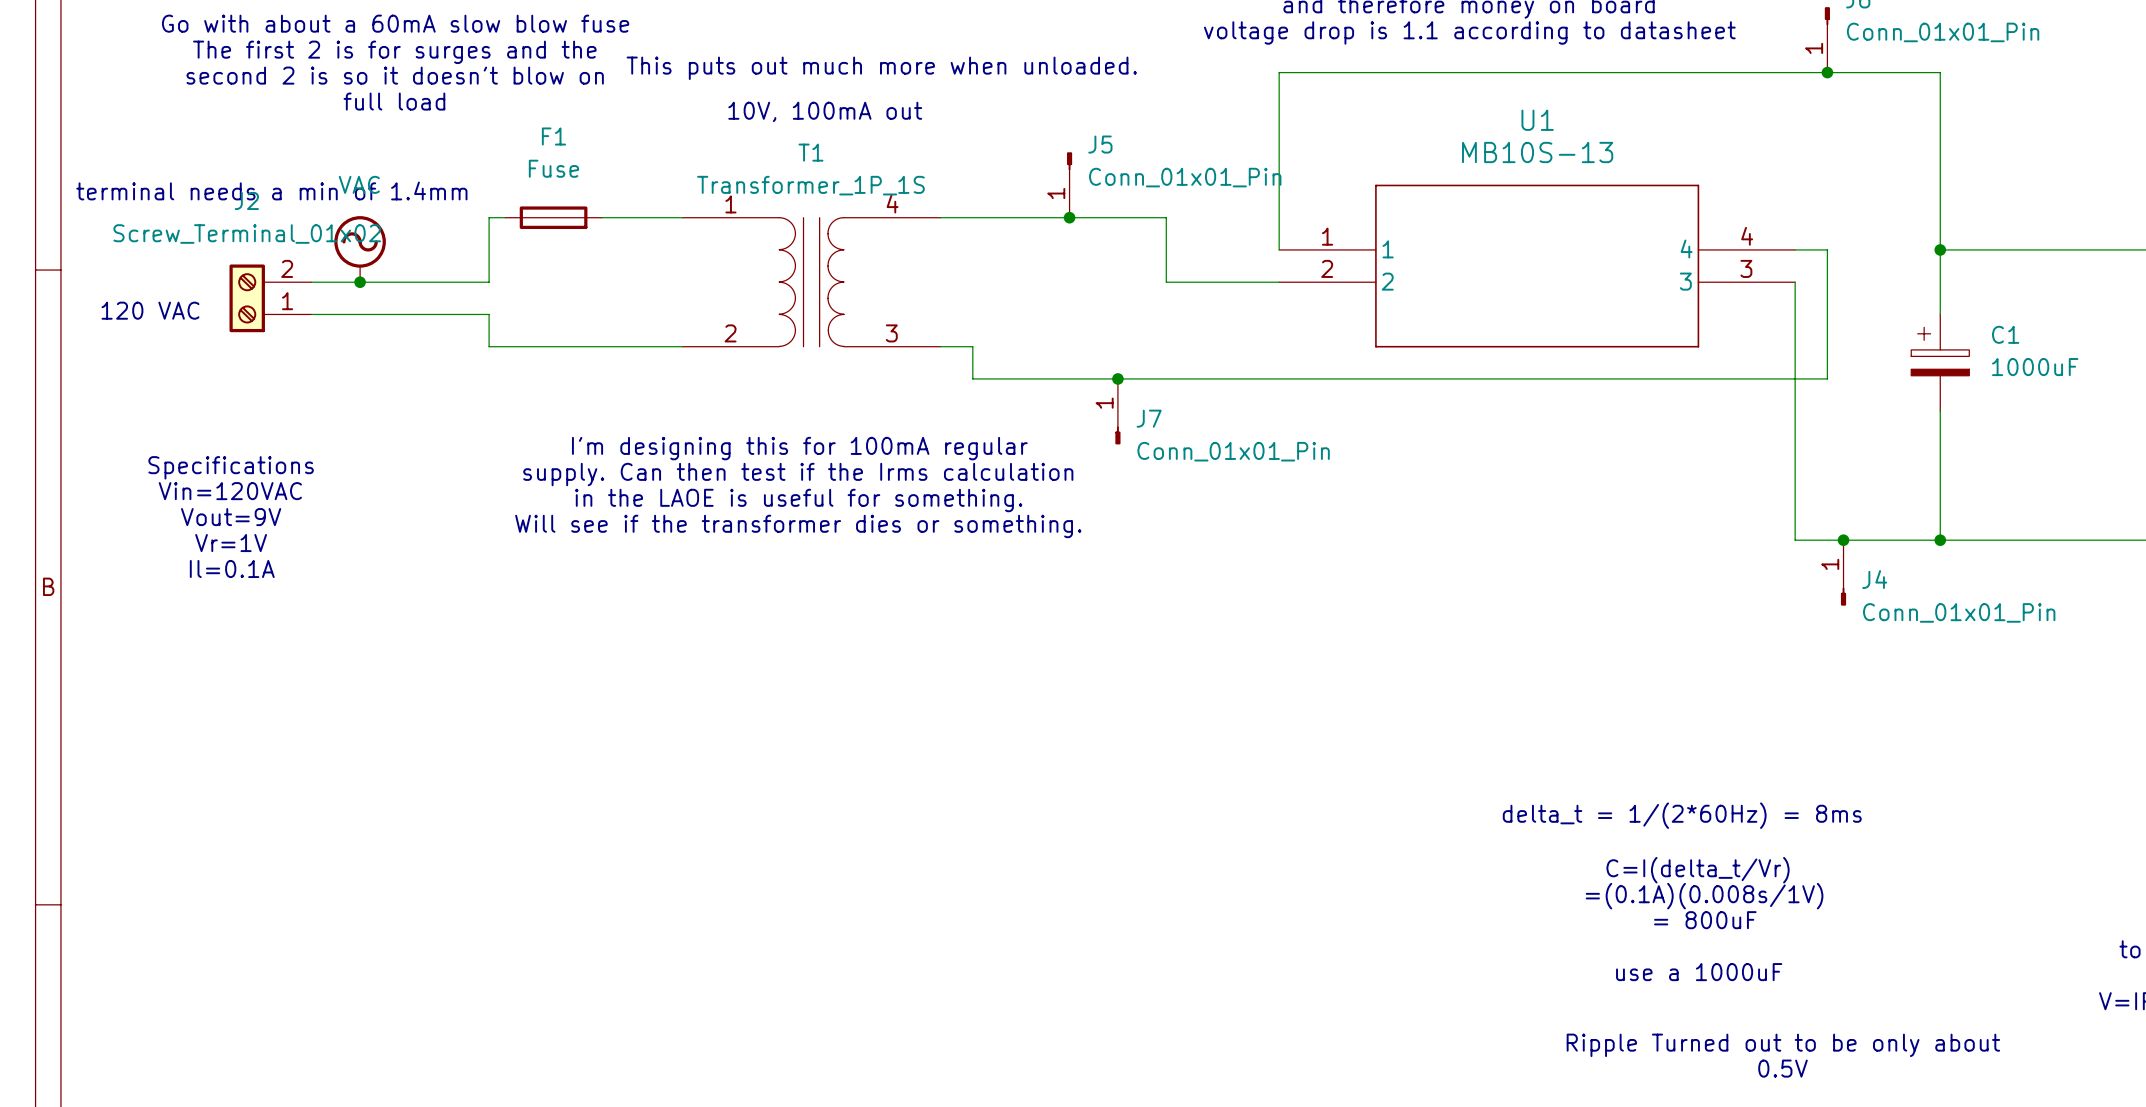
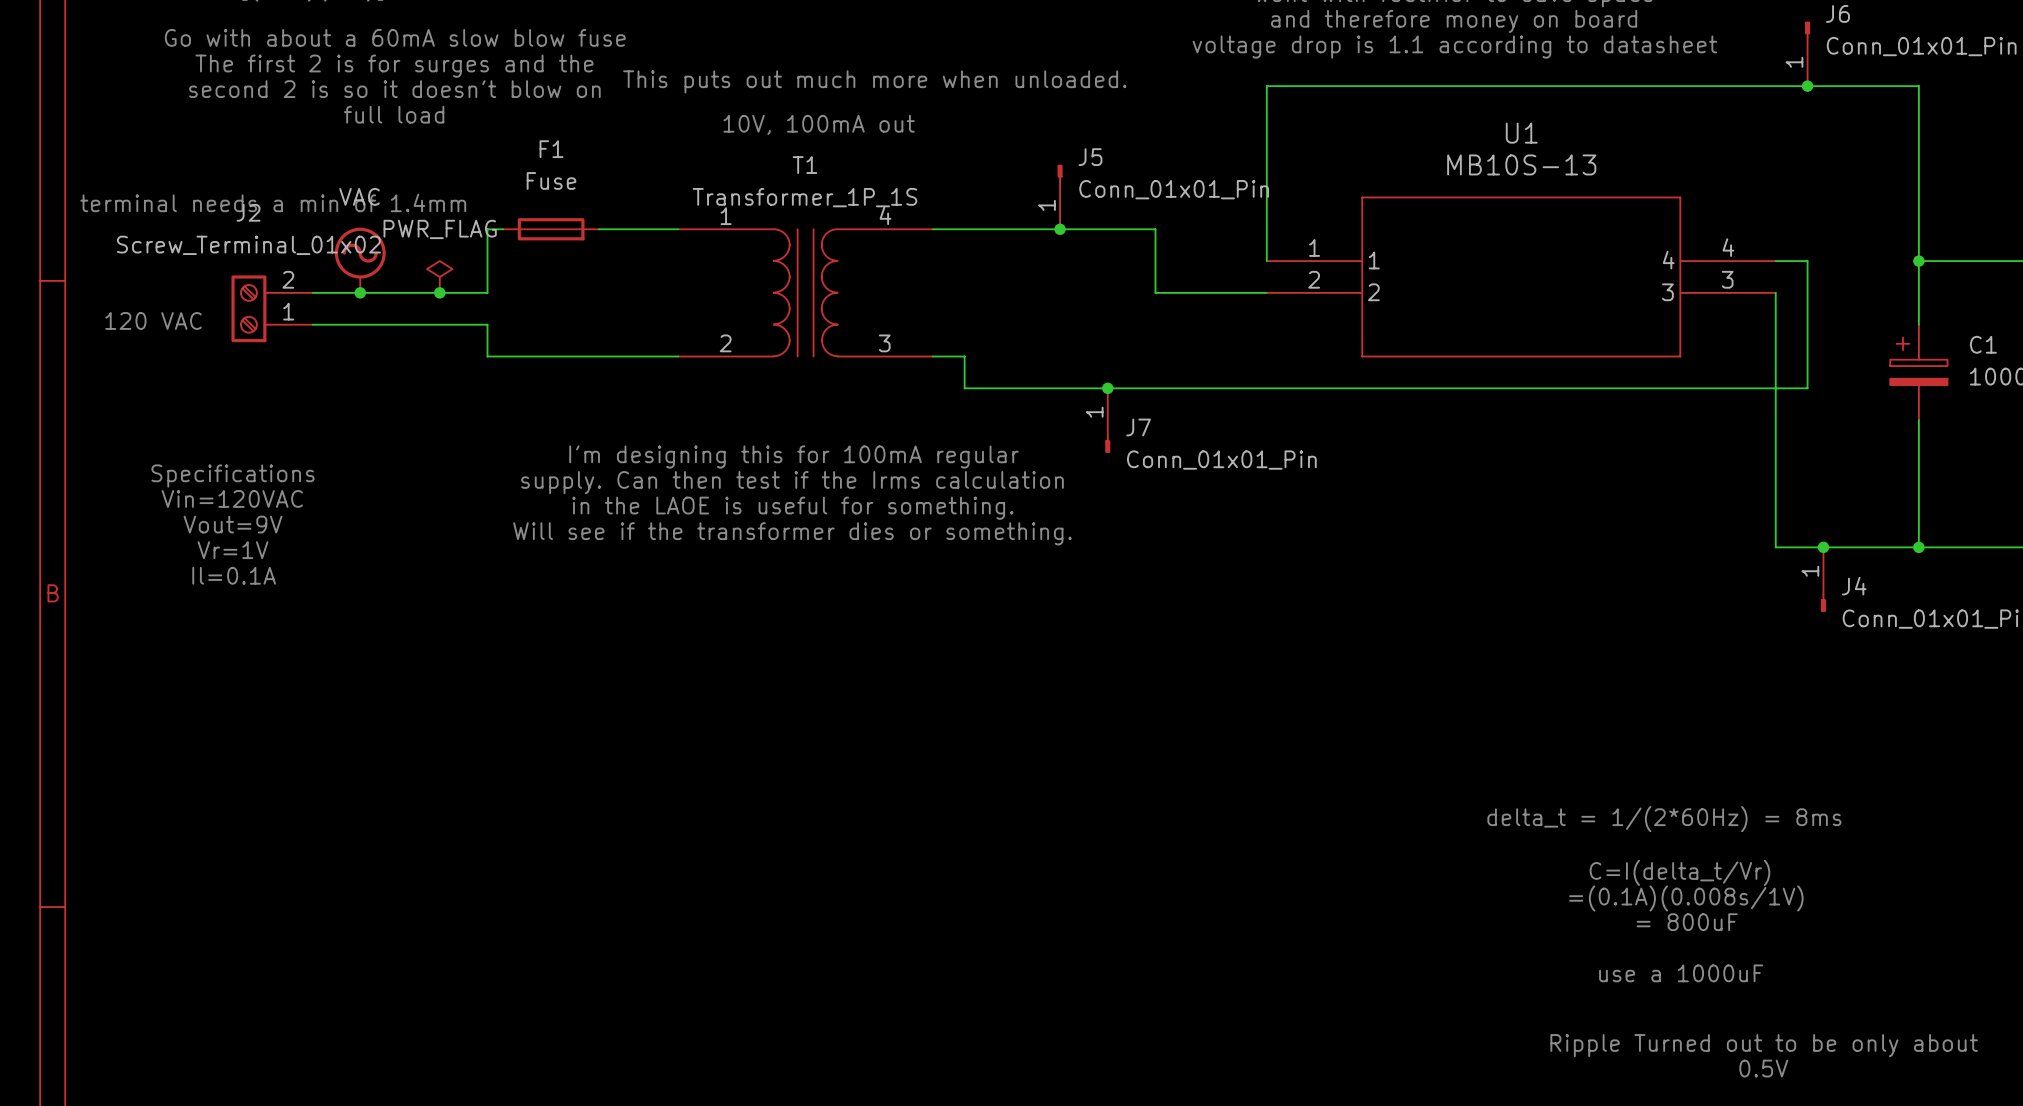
power symbol: none -> PWR_FLAG (439, 276)
junction: none -> (439, 292)

